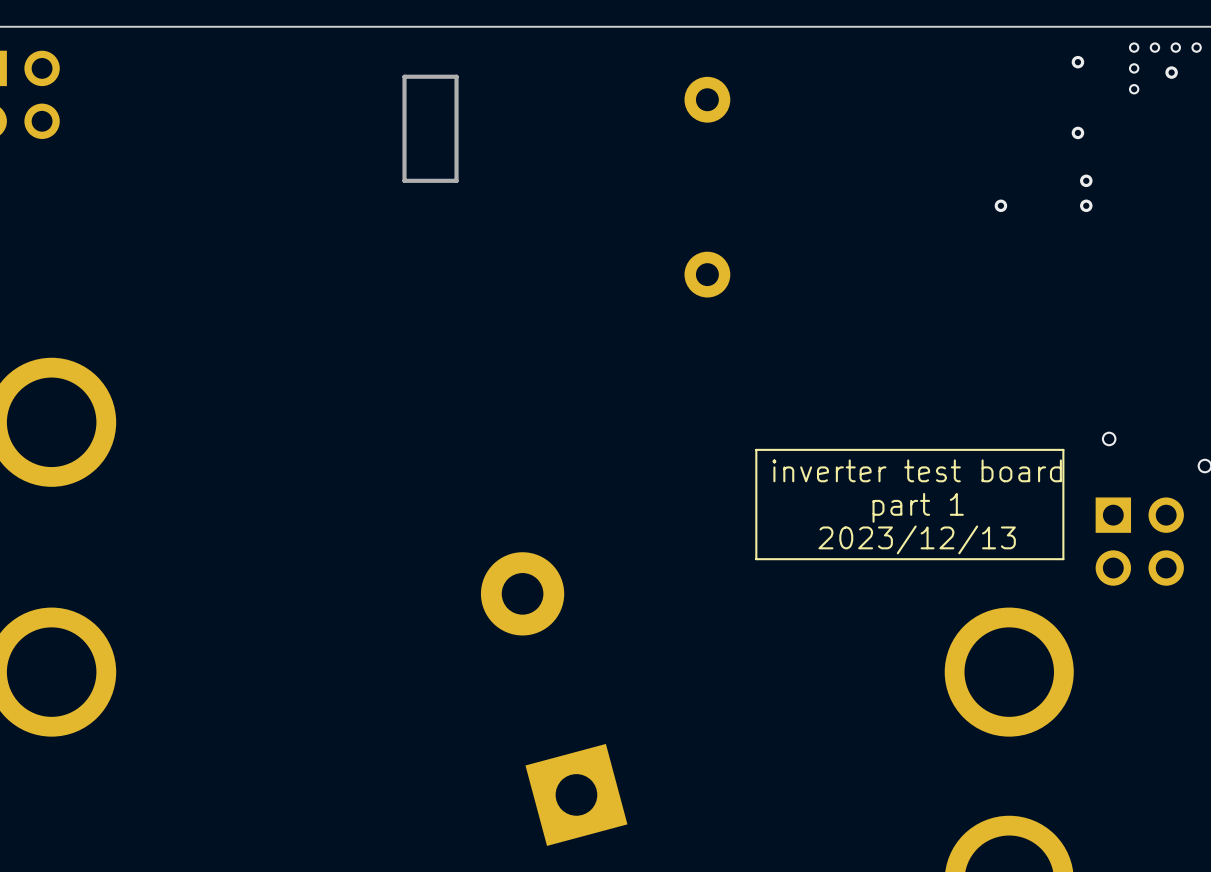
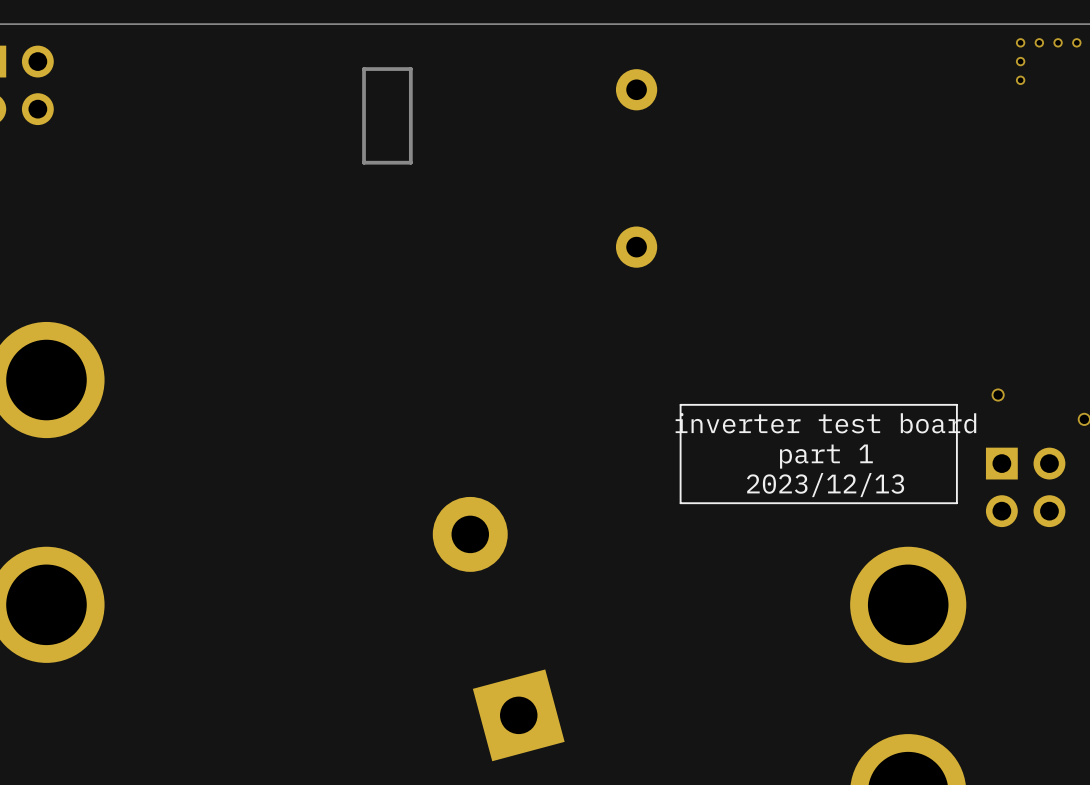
via: (1077, 62) -> none
via: (1171, 72) -> none
via: (1077, 132) -> none
via: (1086, 180) -> none
via: (1000, 205) -> none
via: (1086, 205) -> none

